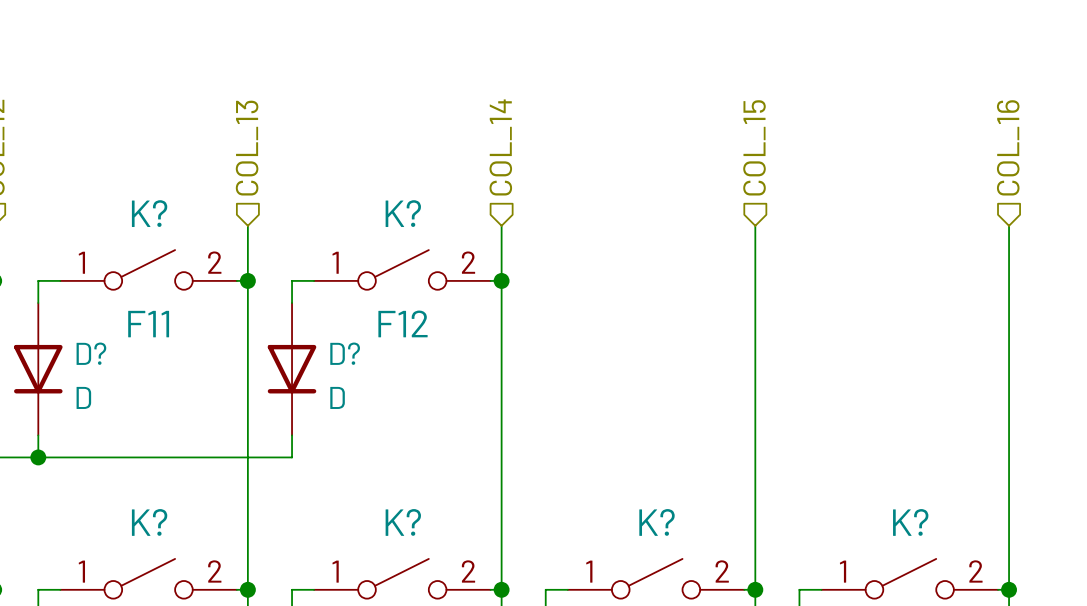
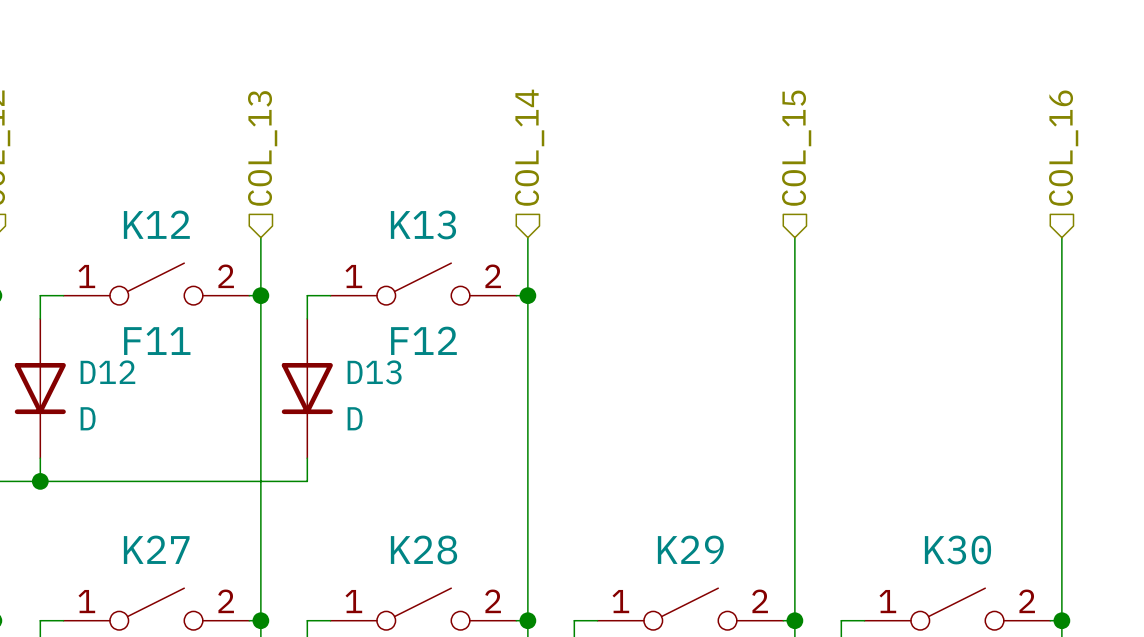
K? name: K? (149, 213) -> K12 (156, 224)
K? name: K? (403, 213) -> K13 (423, 224)
D? name: D? (91, 353) -> D12 (107, 372)
D? name: D? (345, 353) -> D13 (374, 372)
K? name: K? (149, 522) -> K27 (156, 549)
K? name: K? (403, 522) -> K28 (424, 550)
K? name: K? (657, 522) -> K29 (690, 549)
K? name: K? (910, 522) -> K30 (957, 550)

